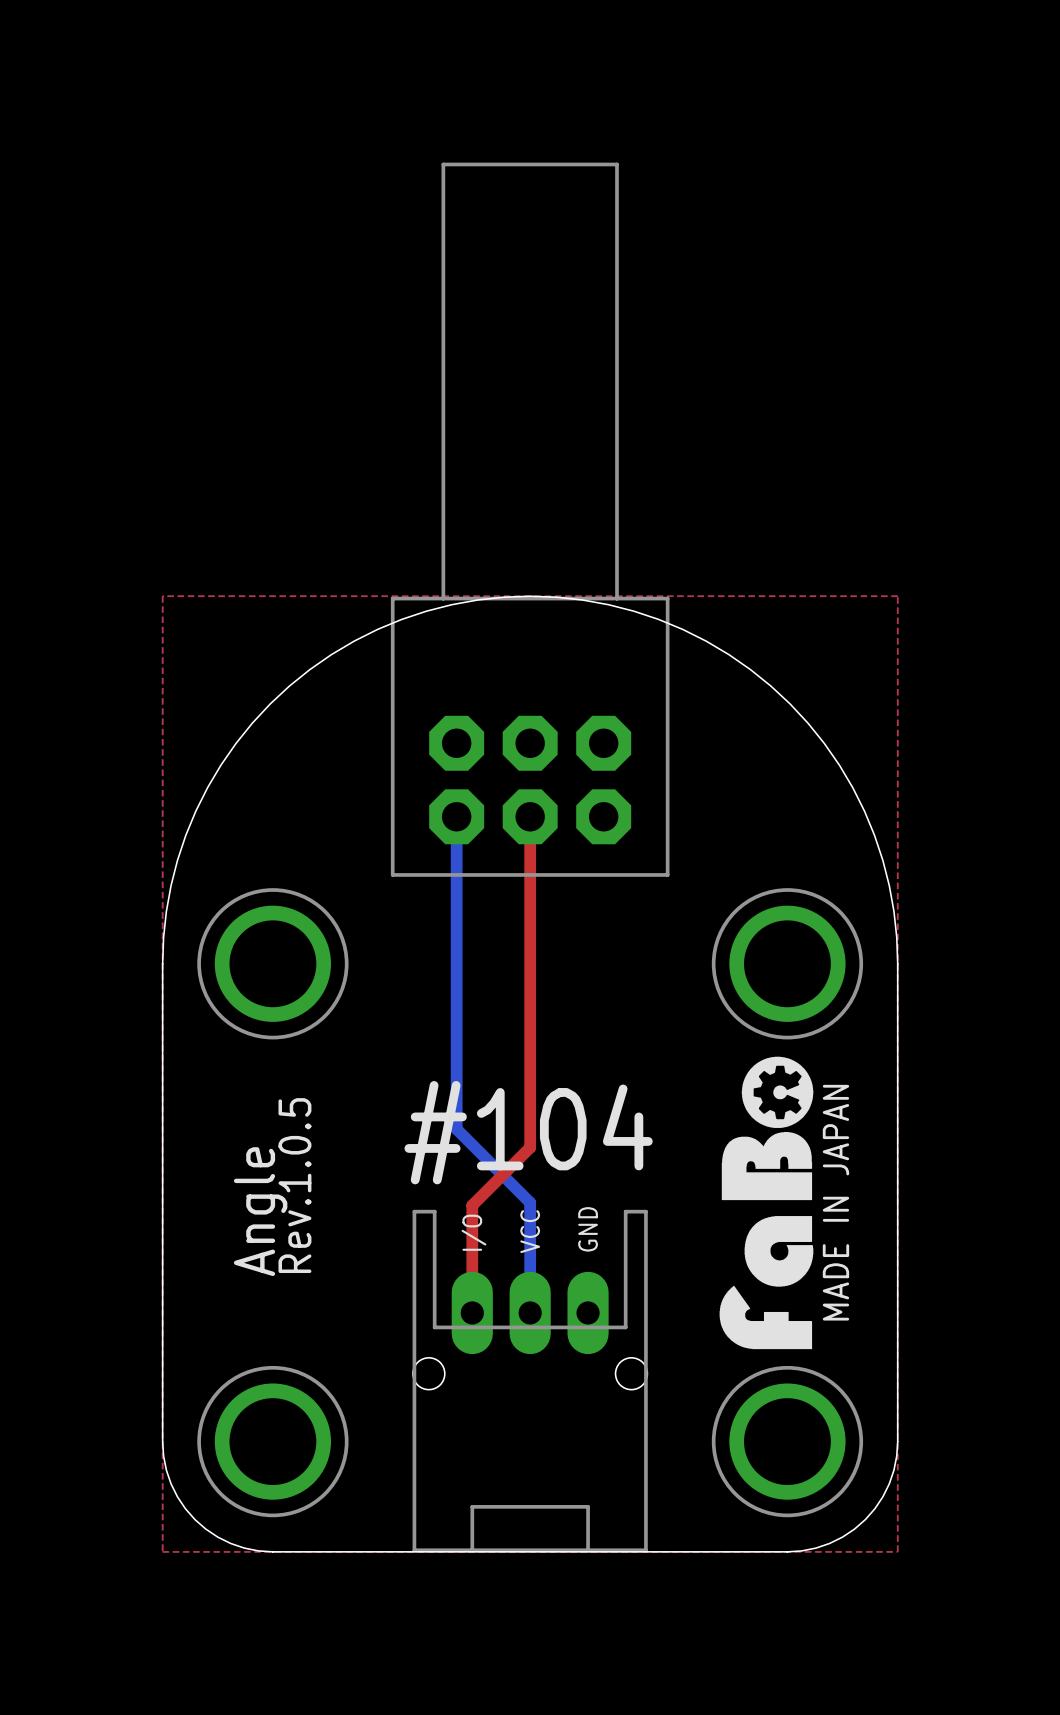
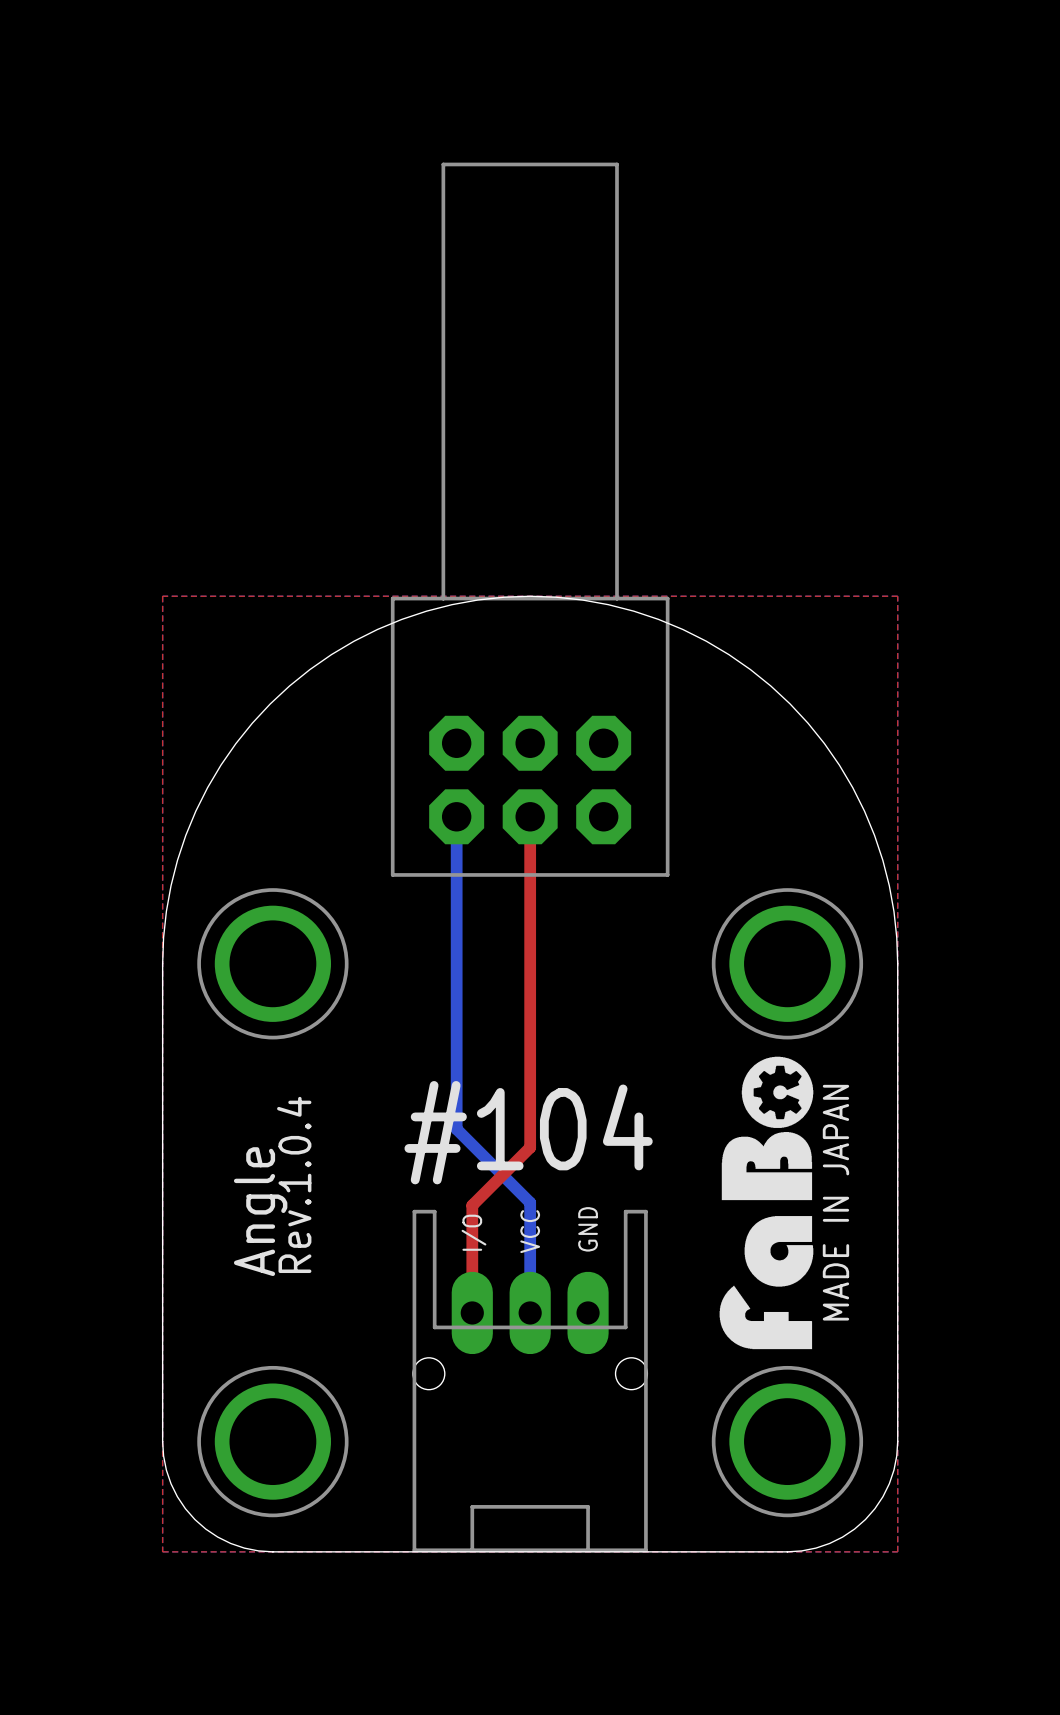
text: Rev.1.0.5 (294, 1185) -> Rev.1.0.4 (294, 1184)

